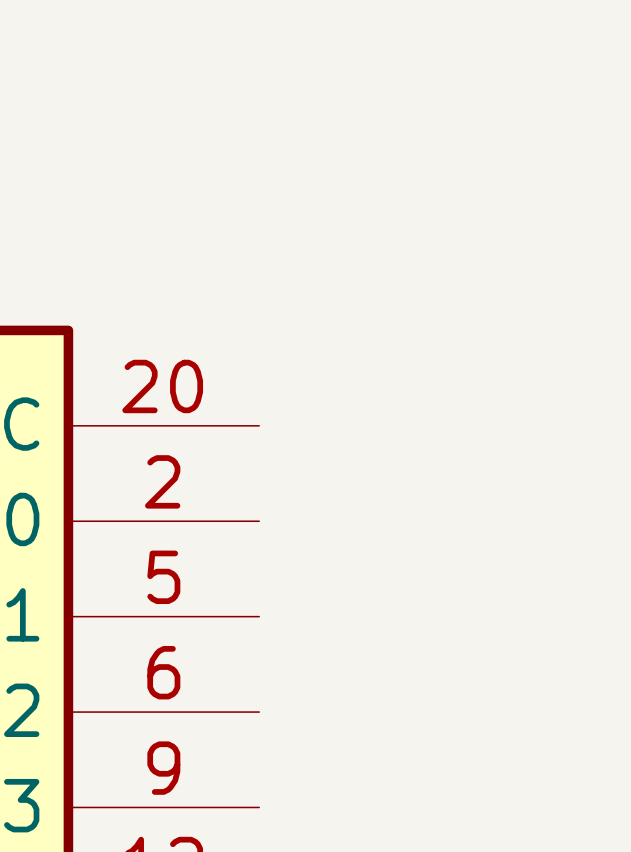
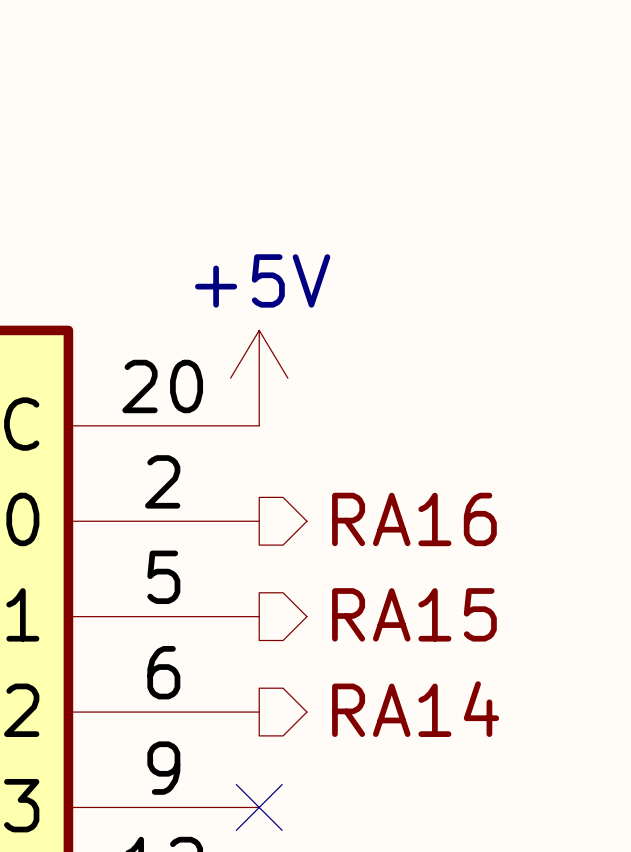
power symbol: none -> +5V (259, 378)
hierarchical label: none -> RA16 (414, 519)
hierarchical label: none -> RA15 (414, 614)
hierarchical label: none -> RA14 (415, 709)
no-connect mark: none -> (259, 807)

